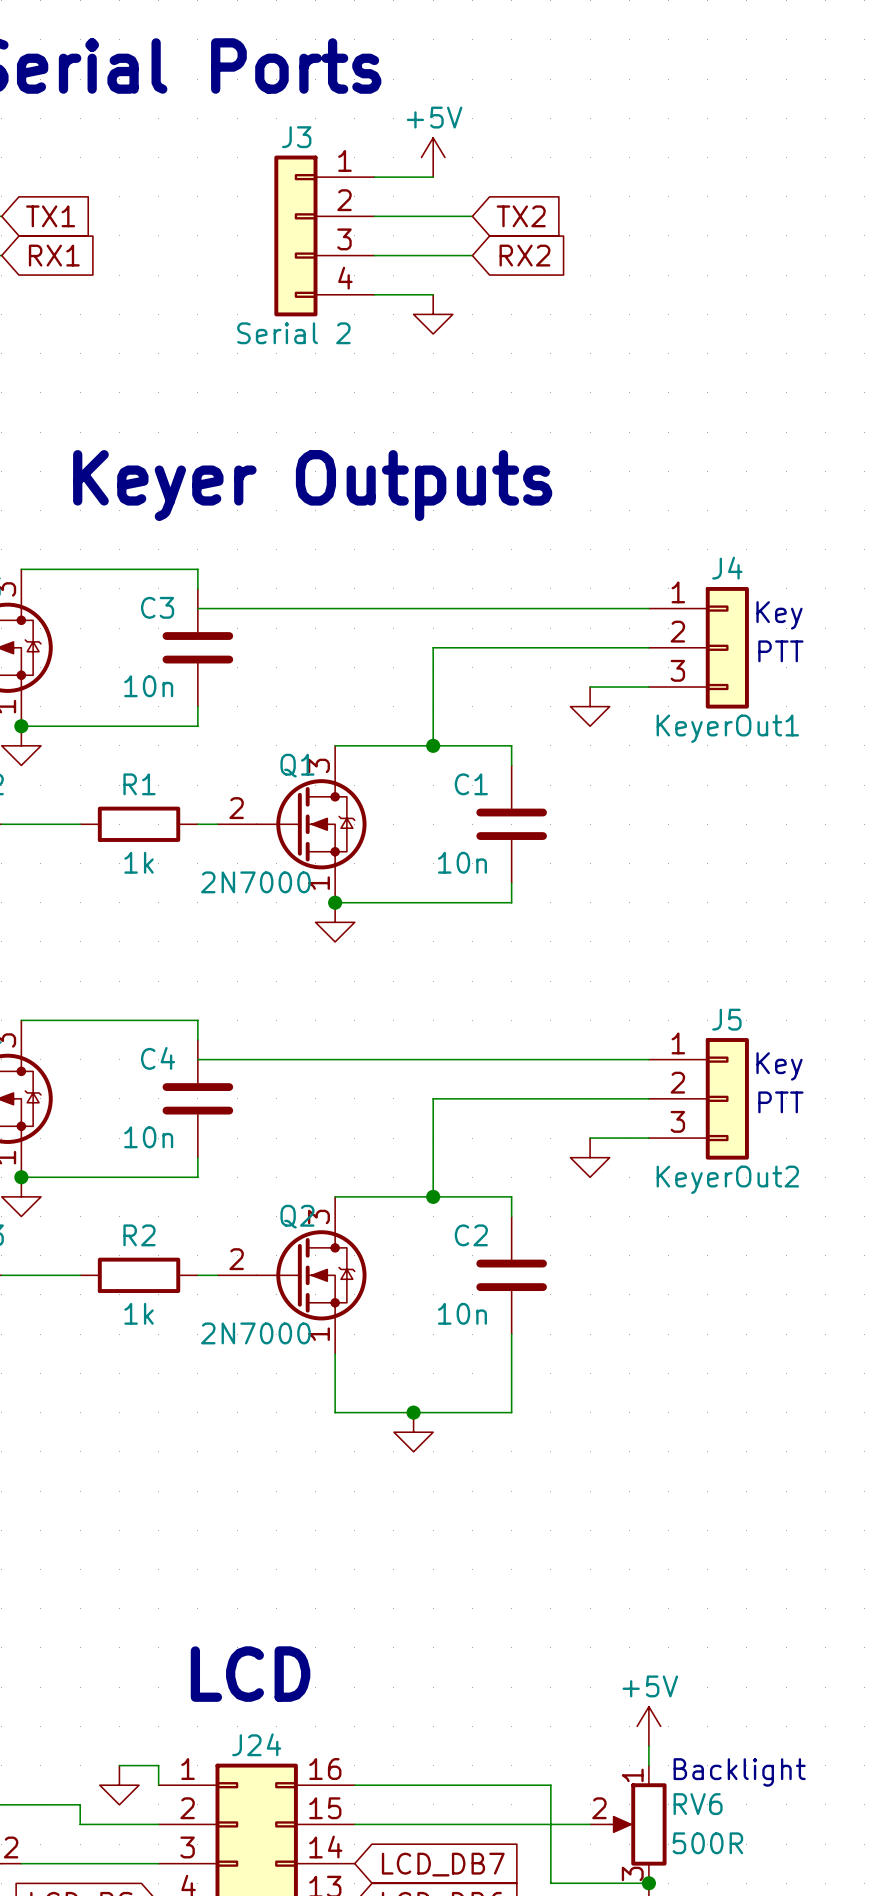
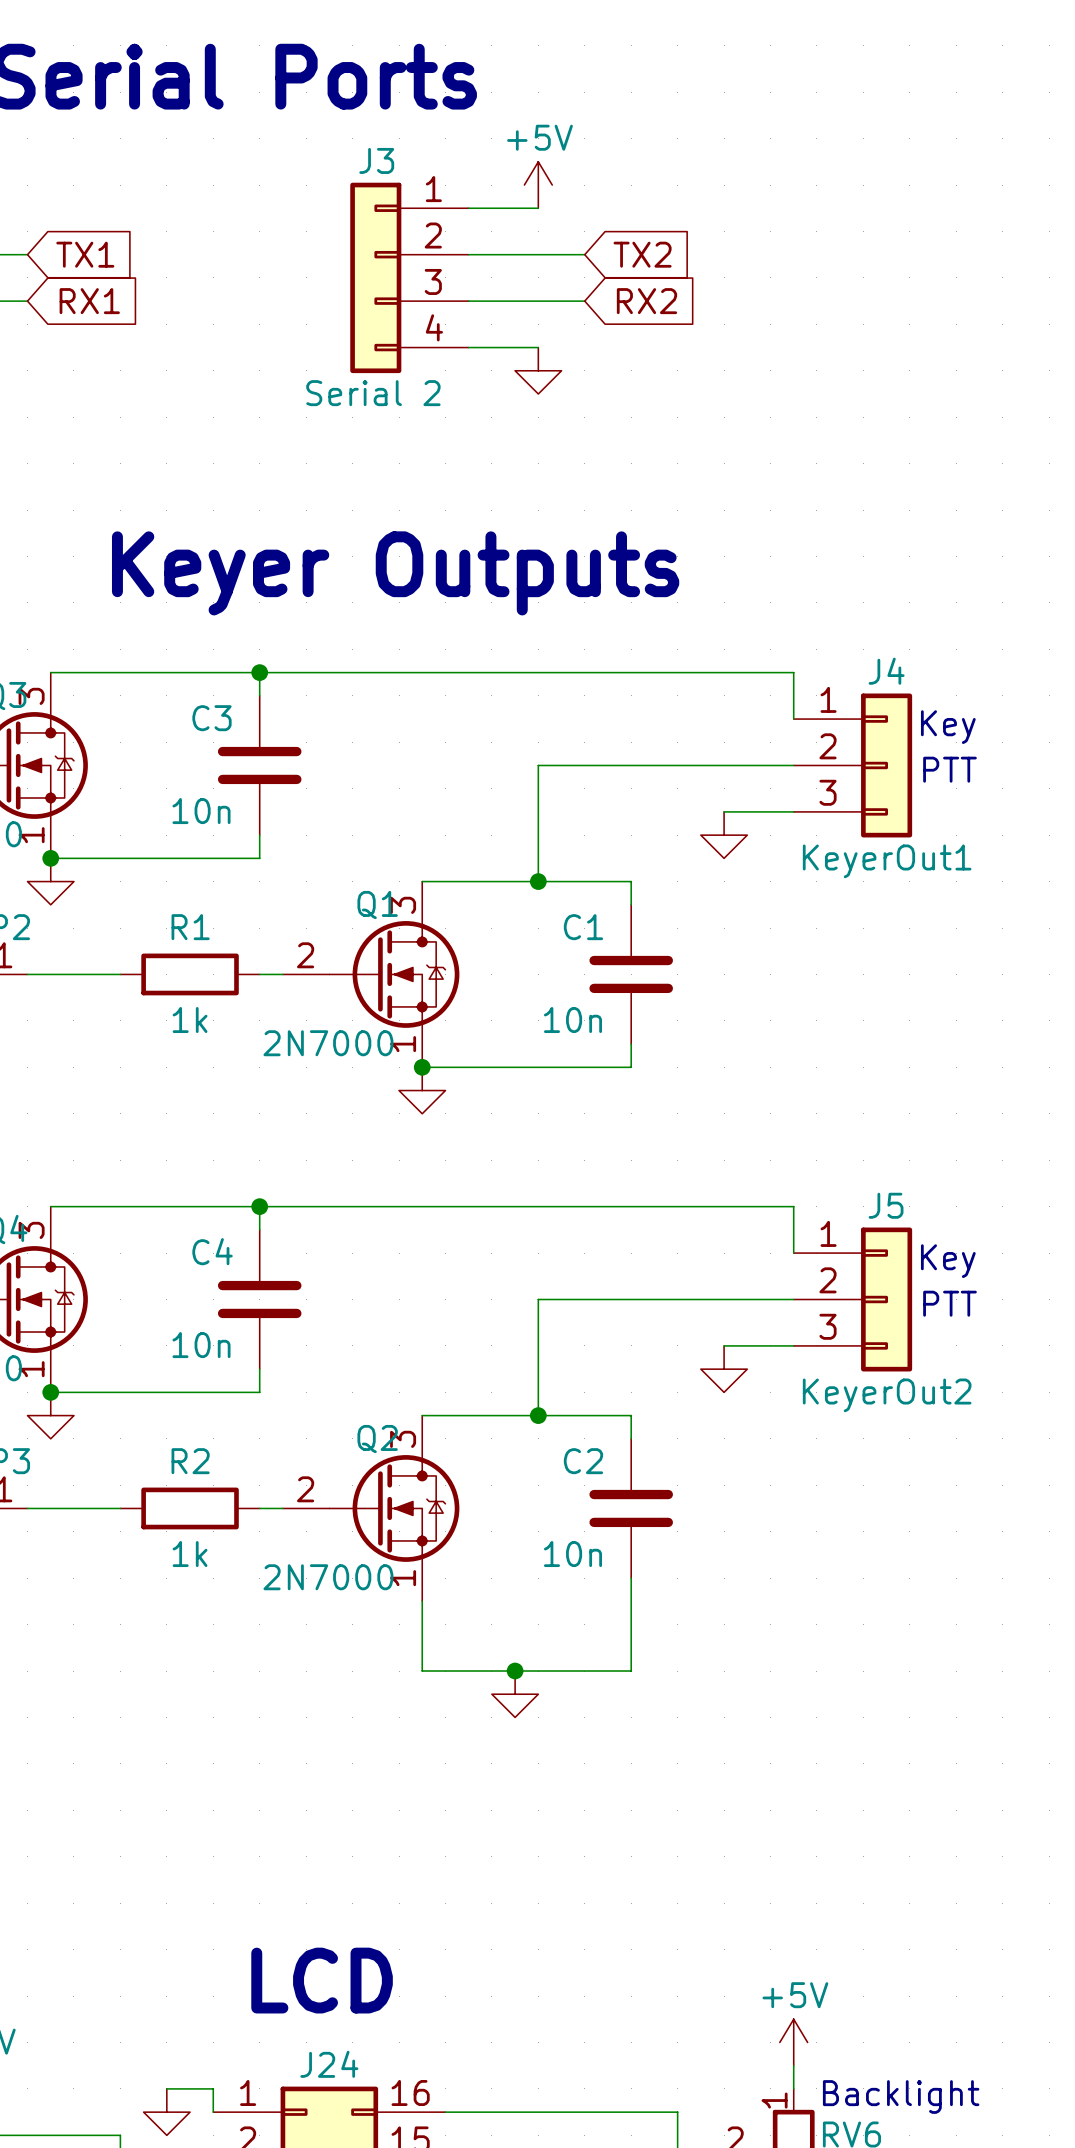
junction: none -> (259, 672)
wire: (197, 608) (648, 608) -> (259, 672) (793, 672) (793, 719)
junction: none -> (259, 1206)
wire: (197, 1059) (648, 1059) -> (259, 1206) (793, 1206) (793, 1253)

